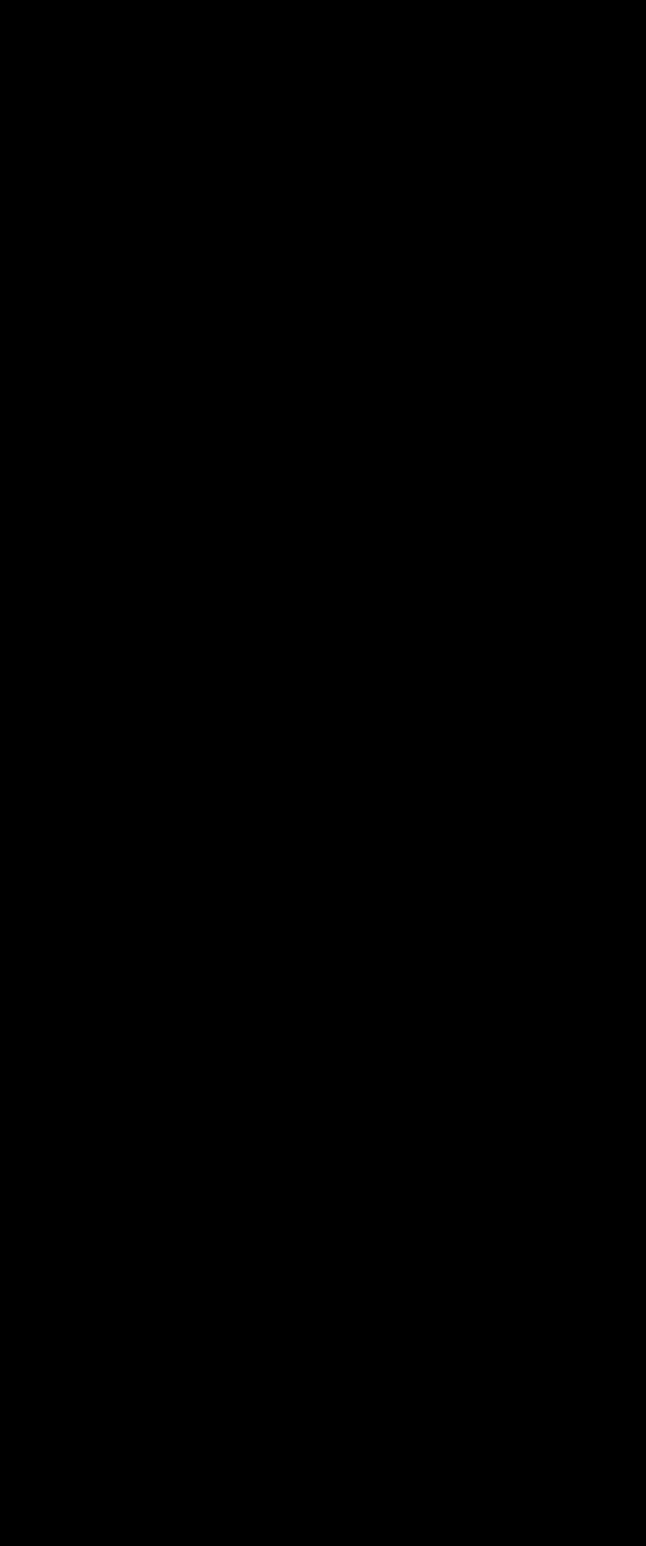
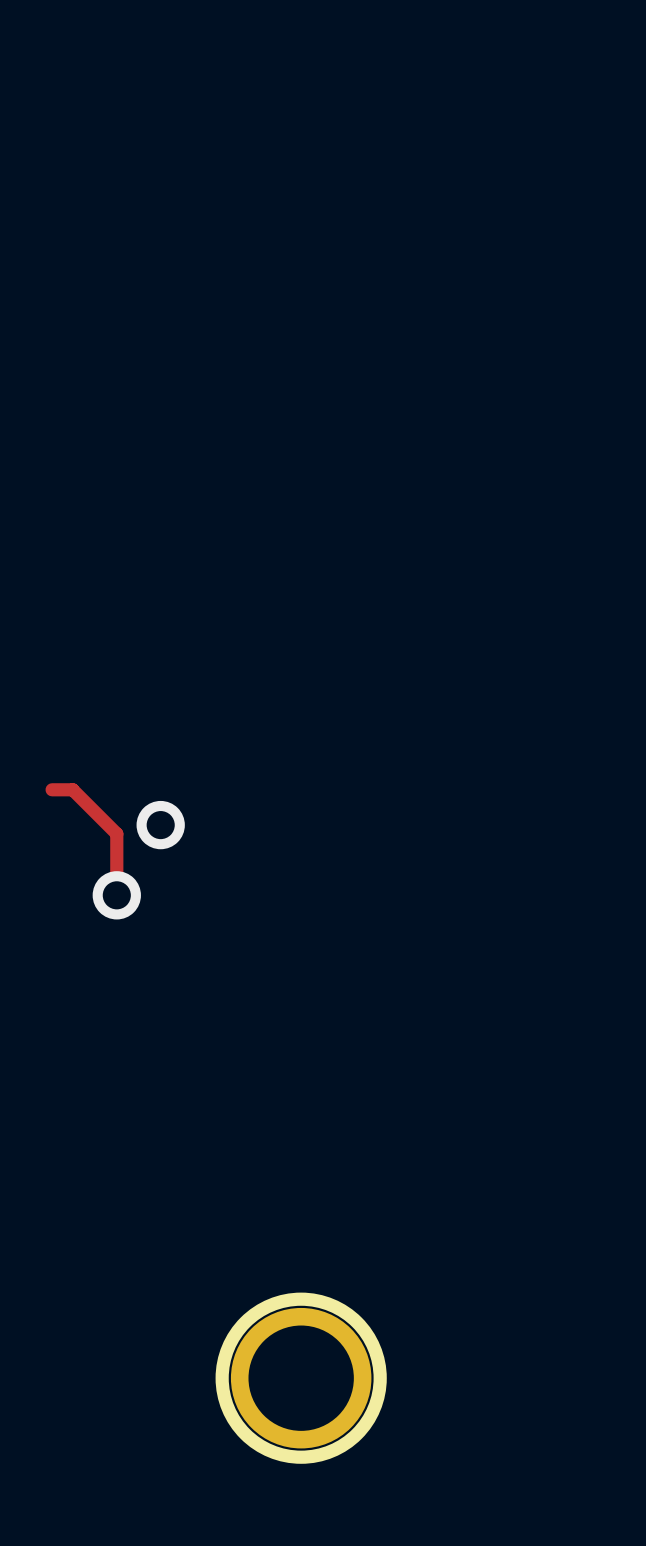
track: none -> (52, 789) (72, 789) (116, 833) (116, 895)
via: none -> (160, 825)
via: none -> (116, 895)
part: none -> (301, 1378)

